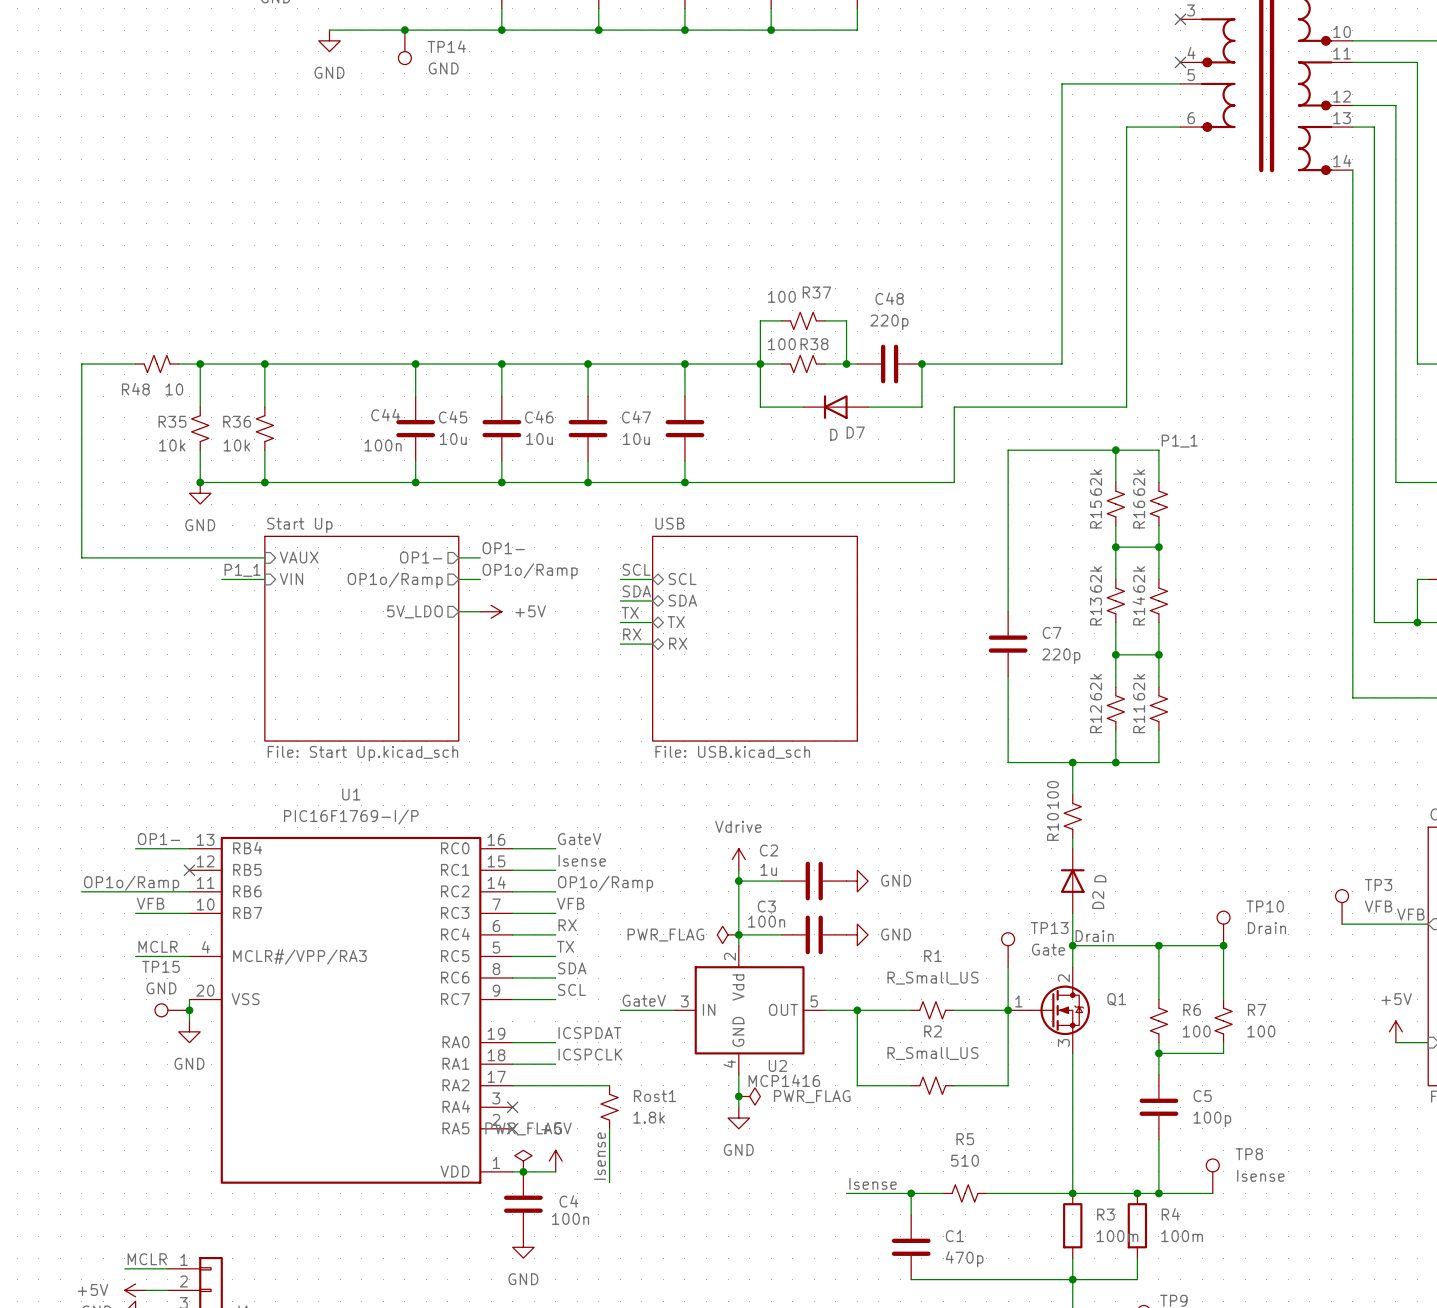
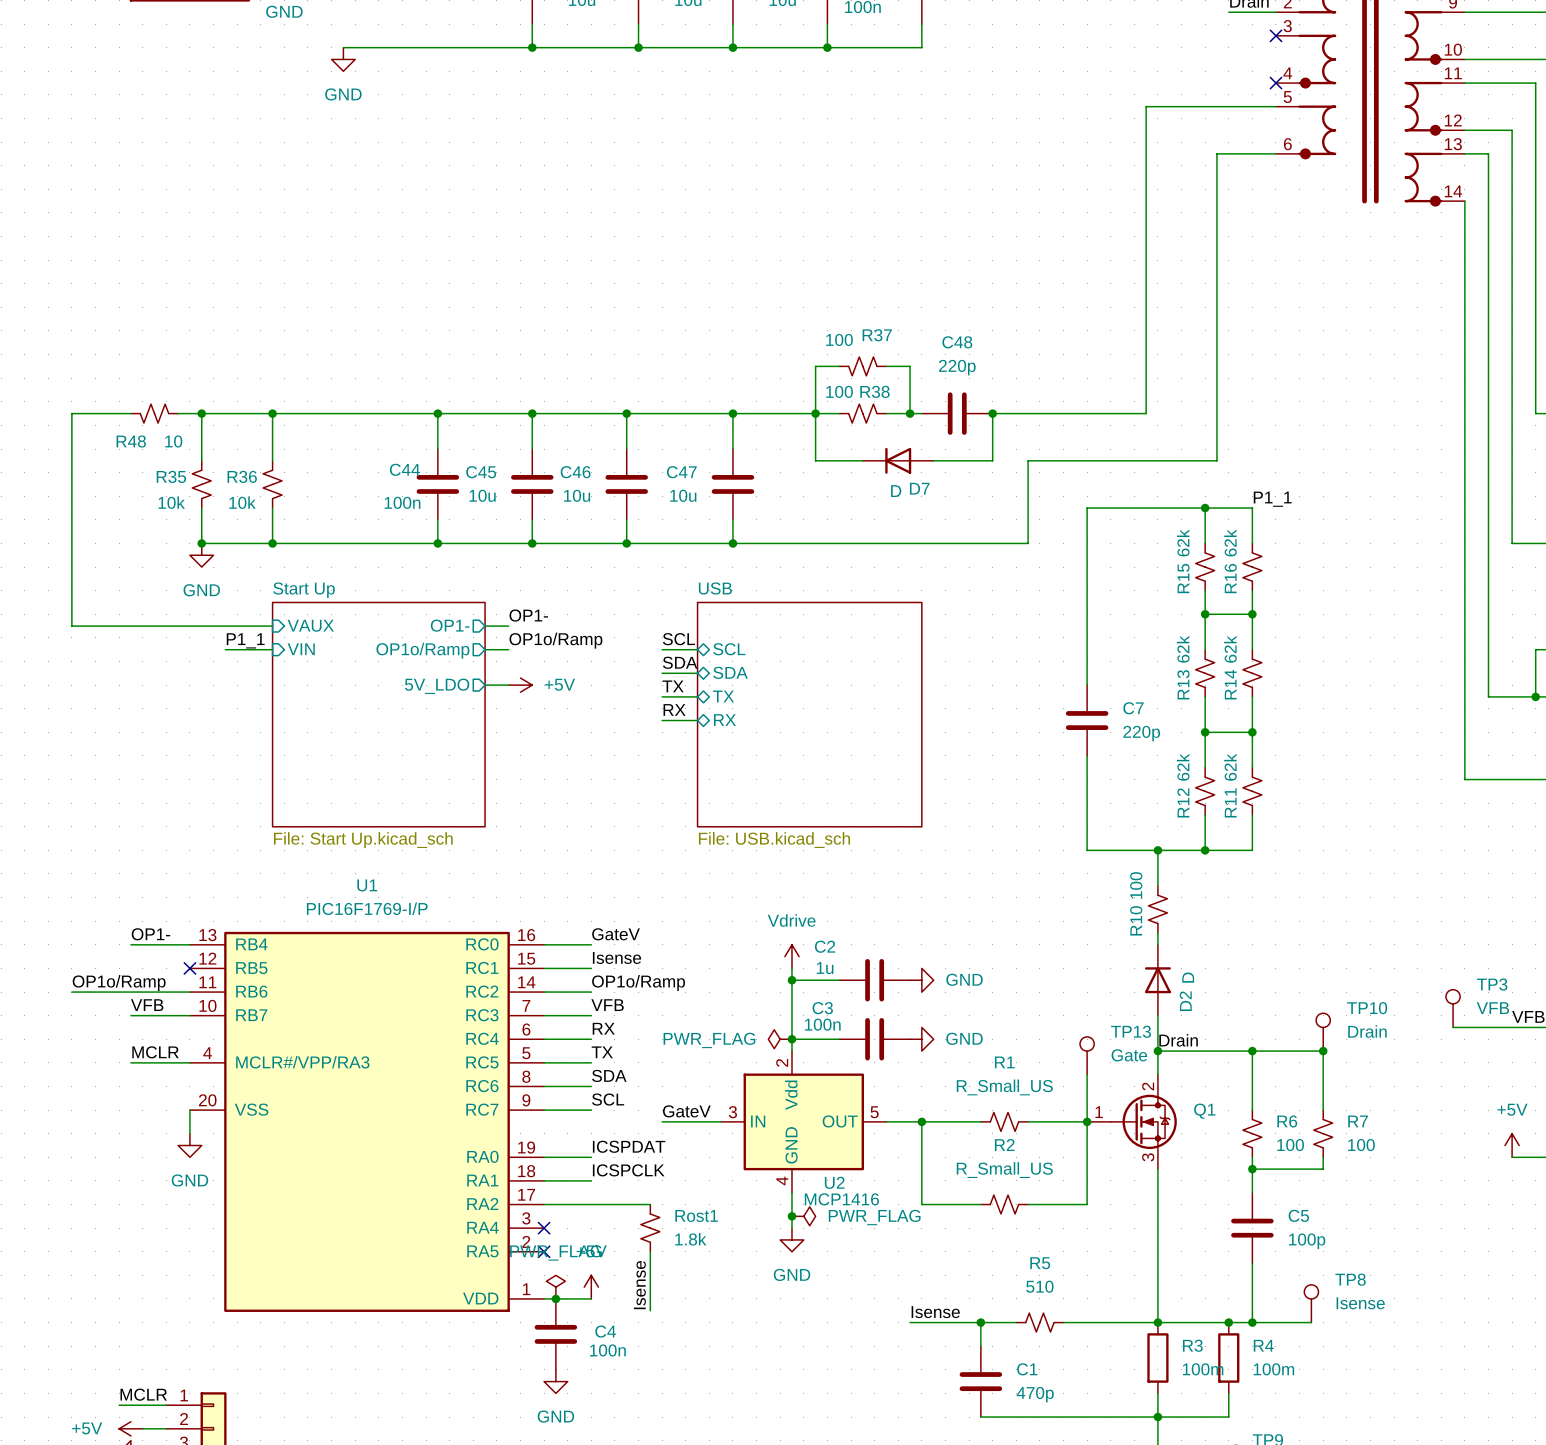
junction: (404, 30) -> none
TP14: GND (404, 47) -> none
TP15: GND (172, 1010) -> none
junction: (189, 1010) -> none

